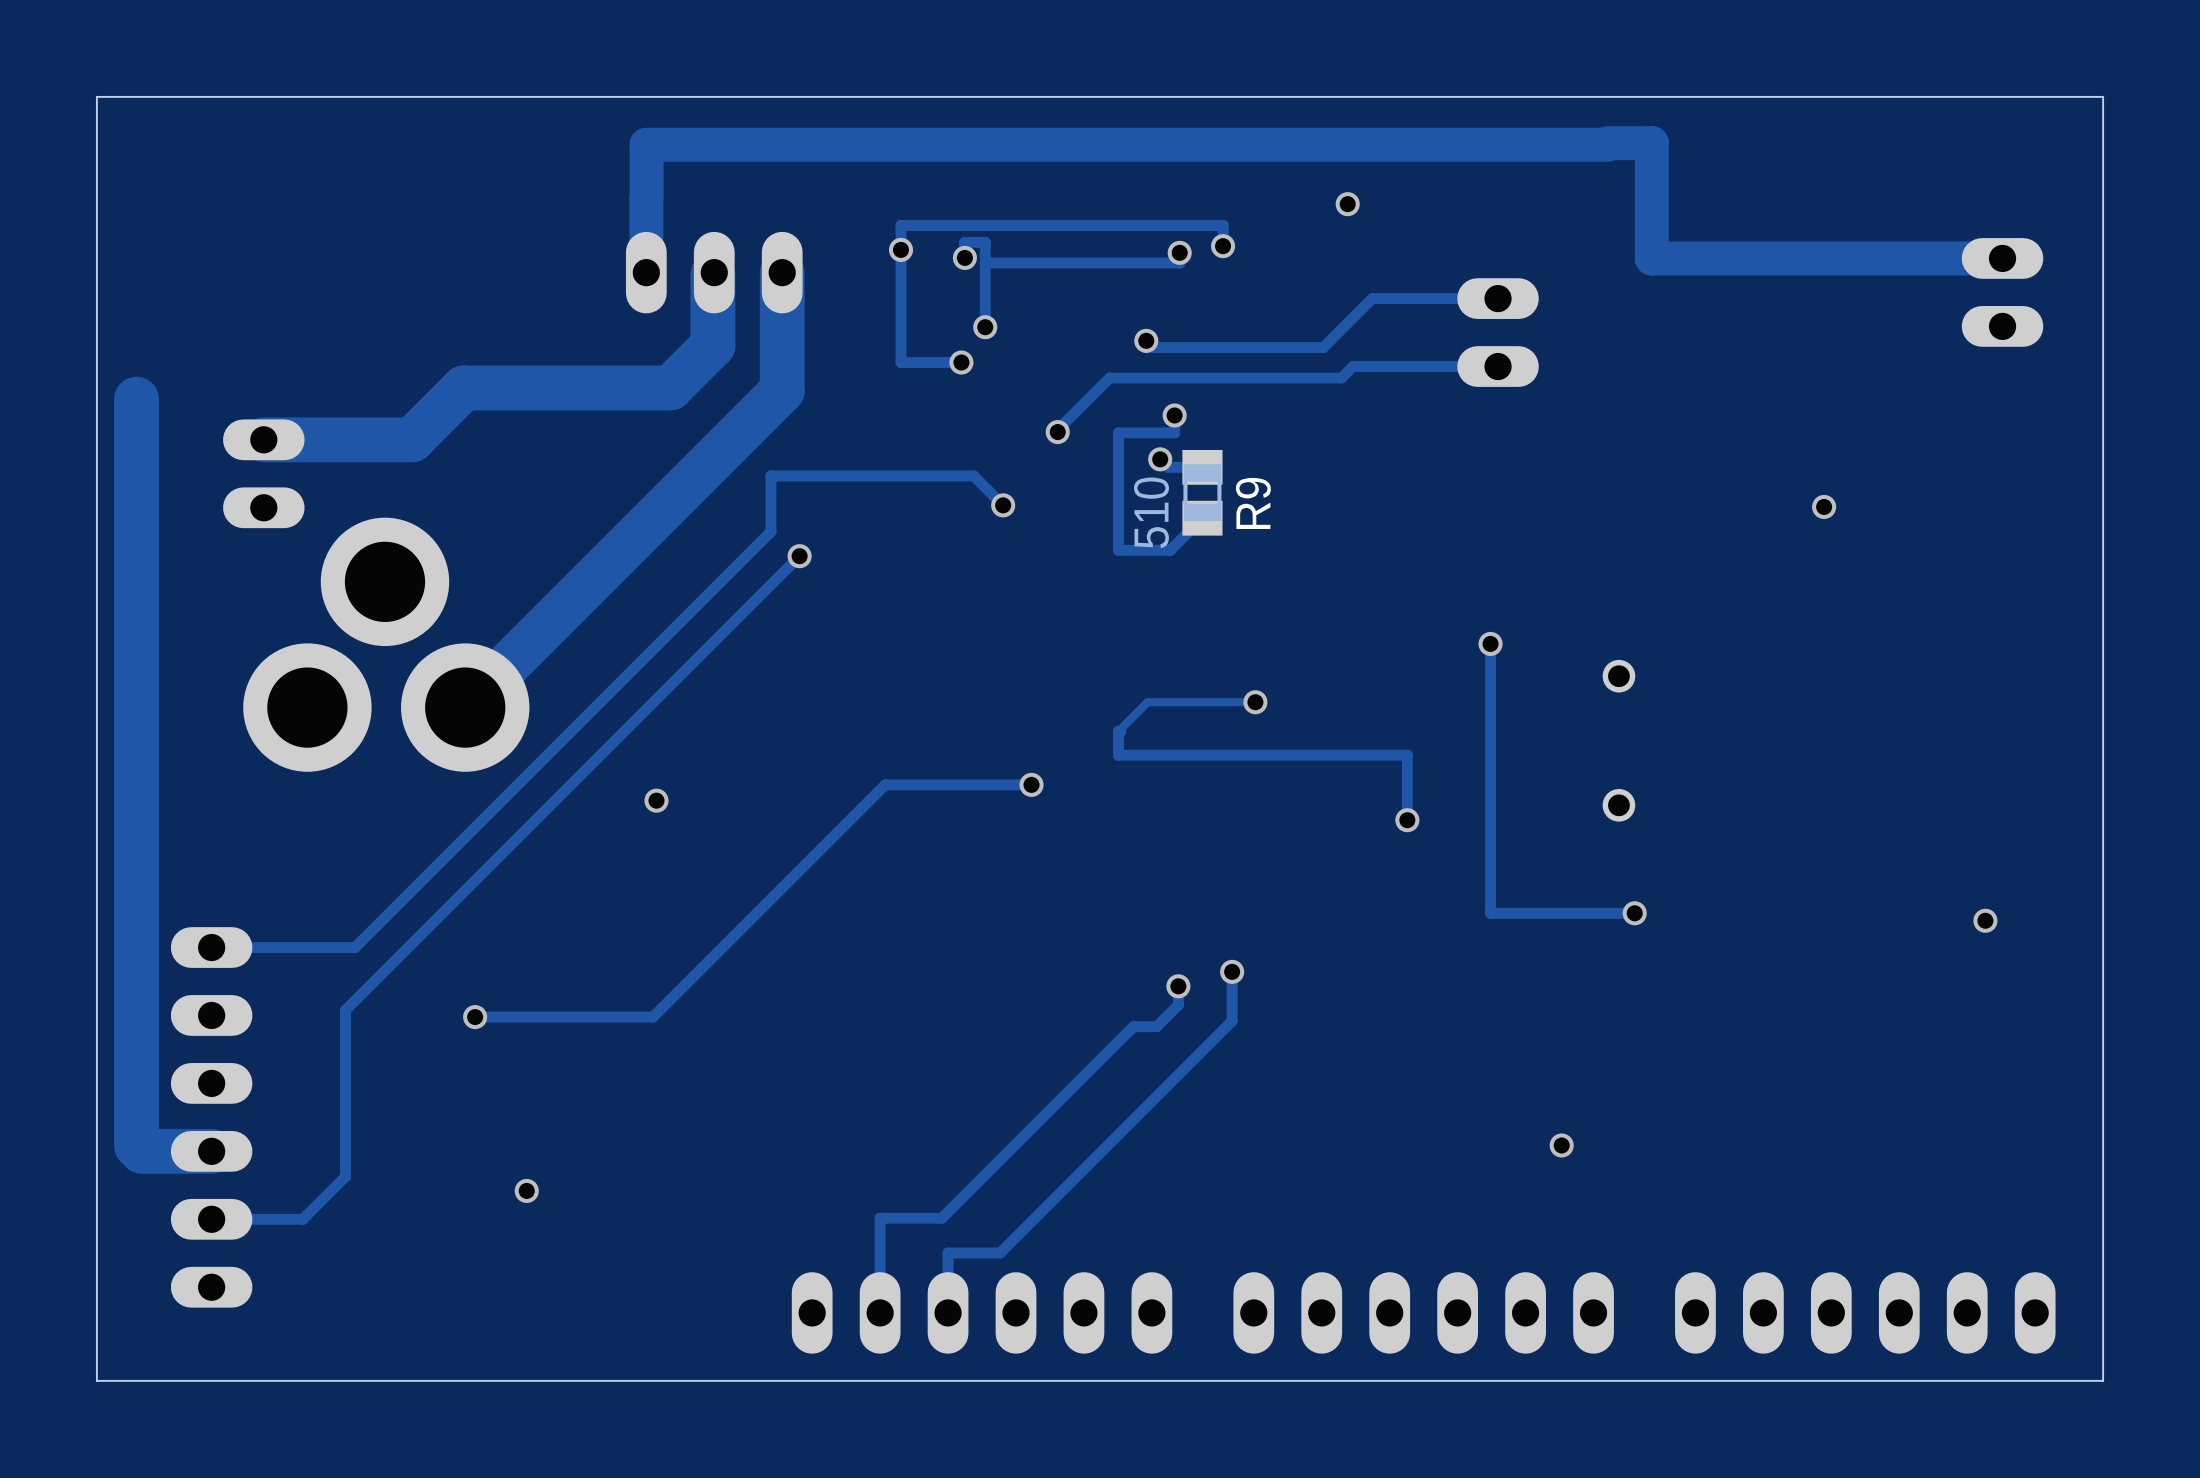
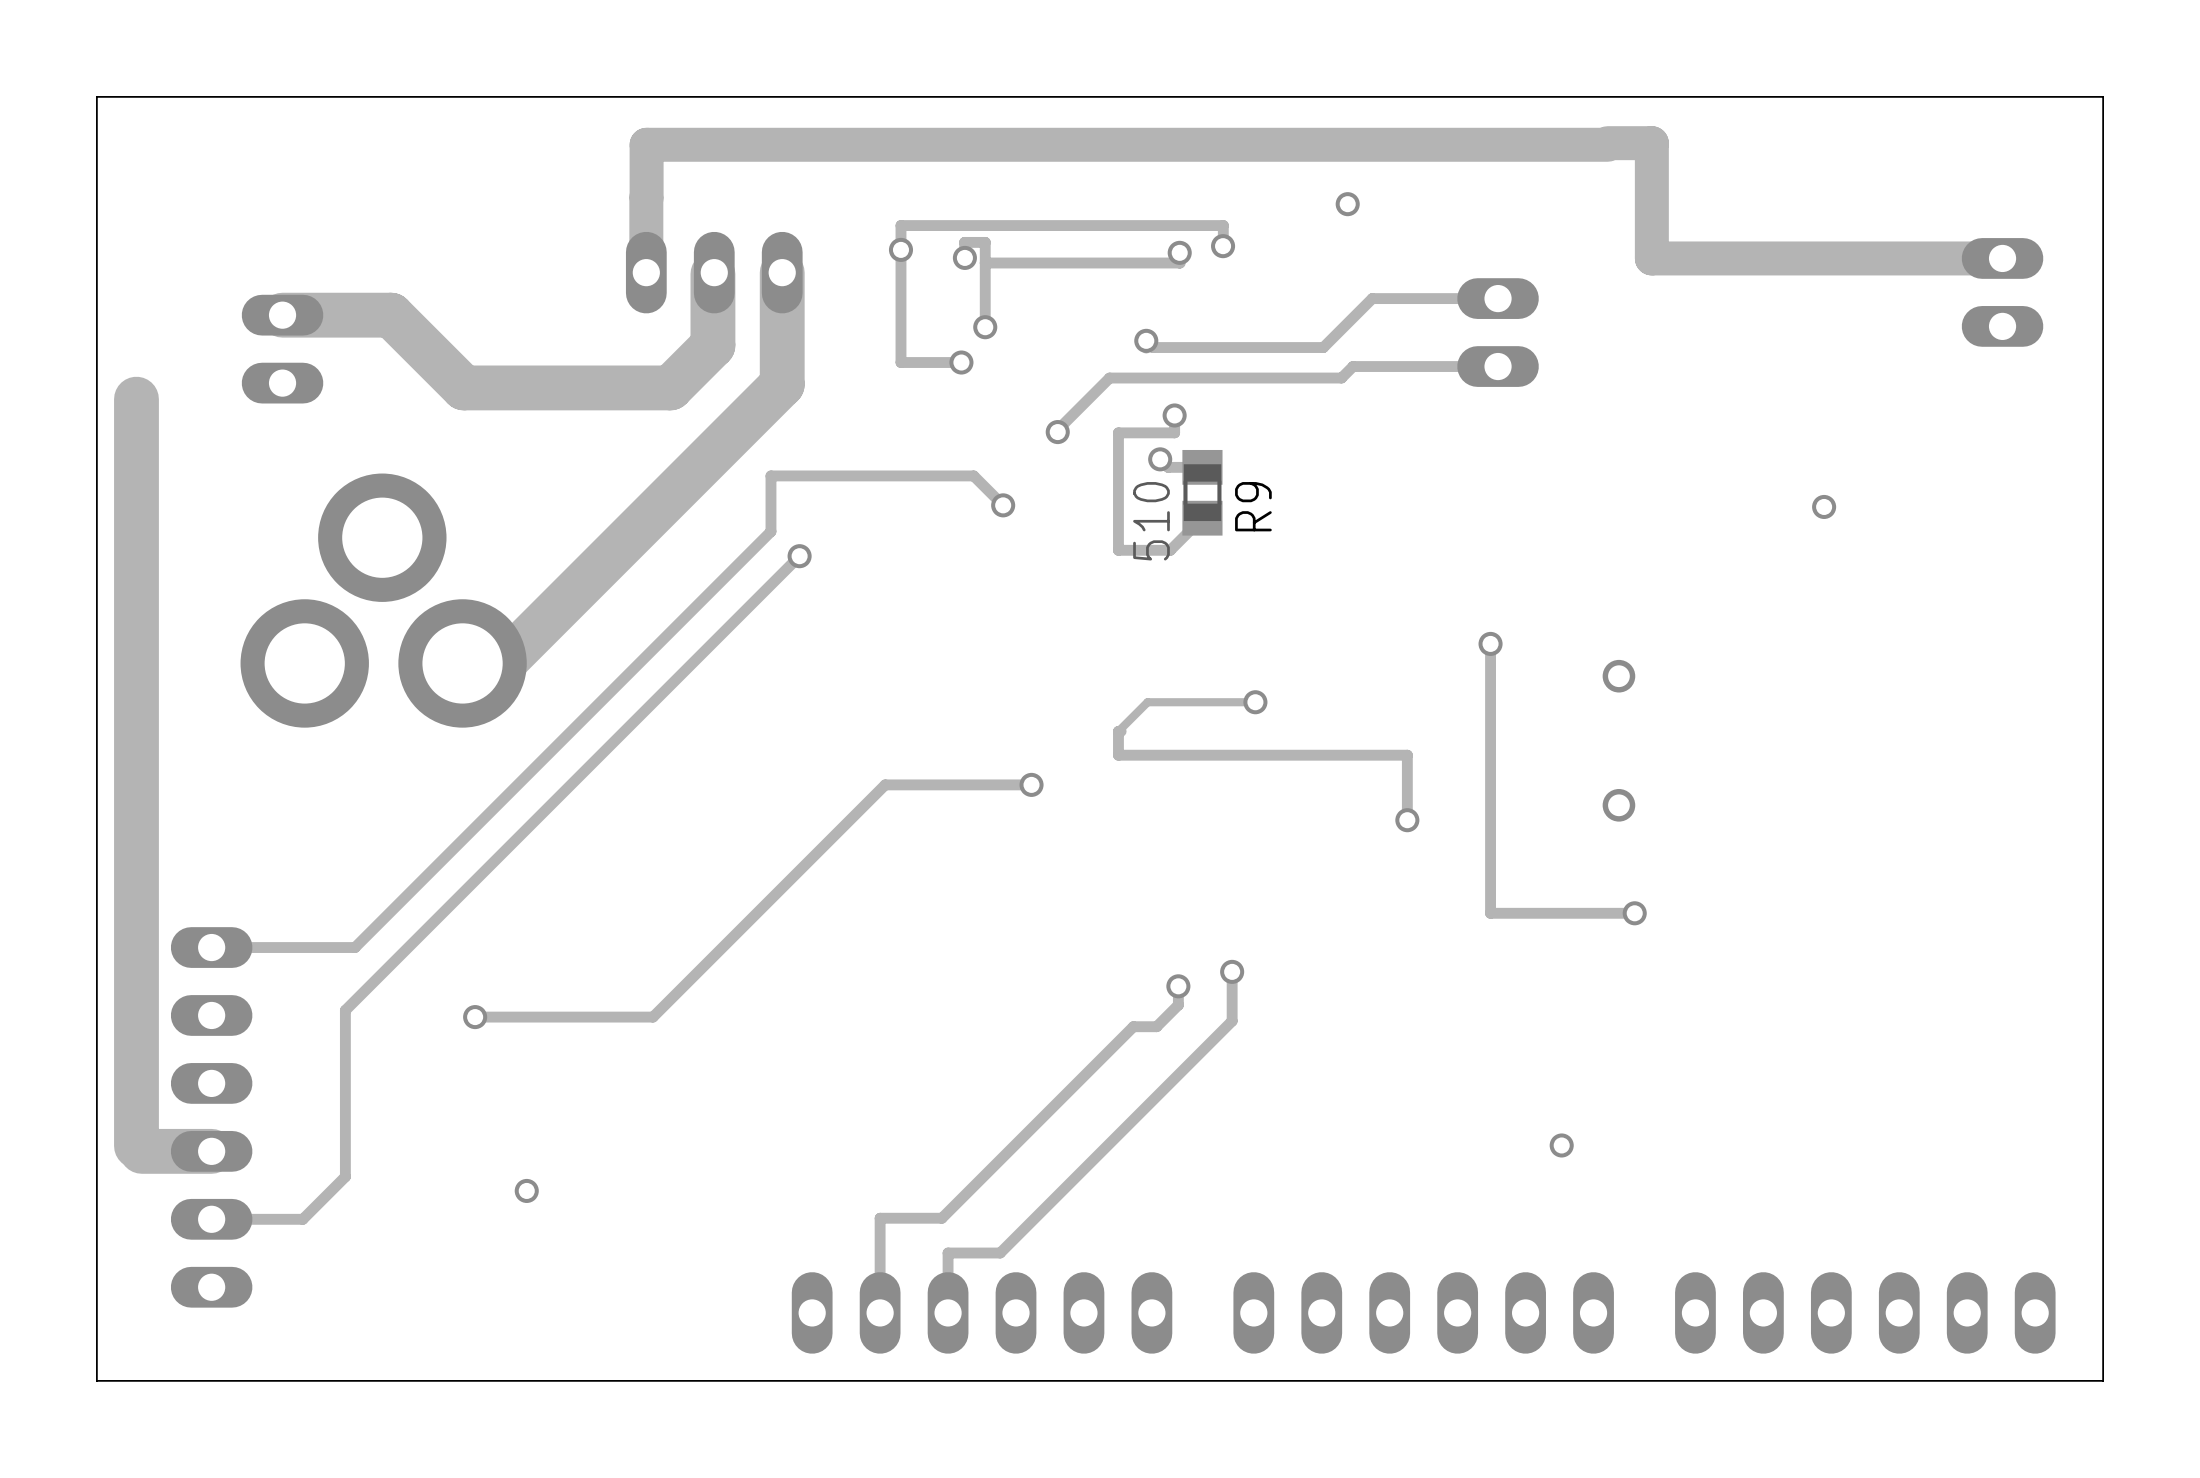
track: (782, 384) (782, 390) (465, 707) -> (782, 384) (503, 663) (462, 663)
track: (463, 387) (412, 439) (263, 439) -> (463, 387) (391, 315) (282, 315)
part position: (263, 473) -> (282, 349)
part position: (386, 644) -> (383, 600)
via: (656, 800) -> none
via: (1985, 920) -> none

